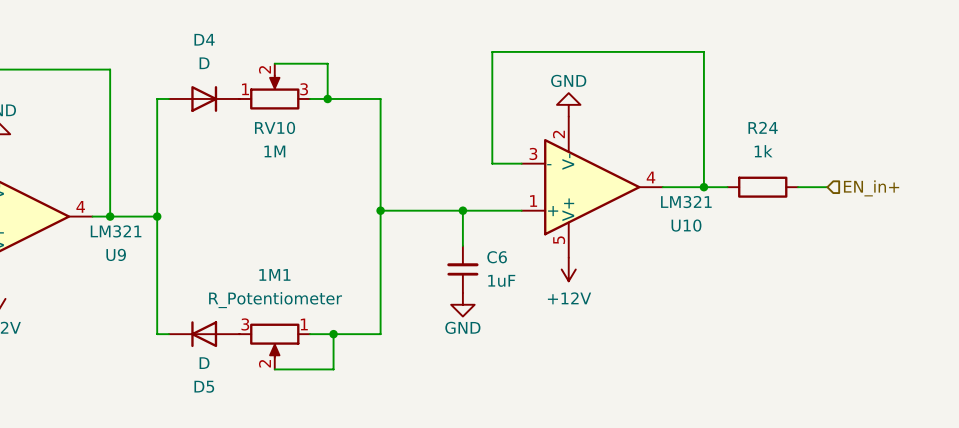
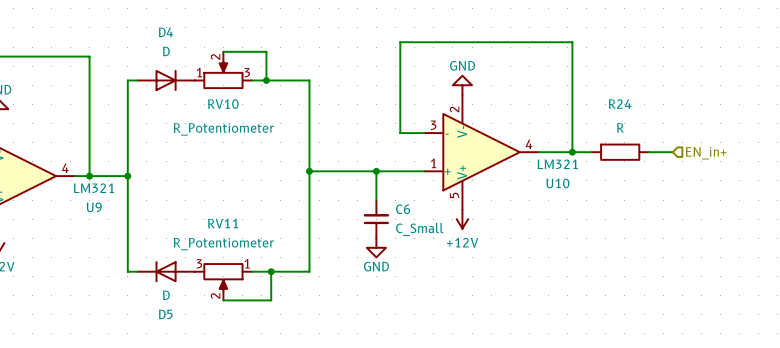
RV10 value: 1M (274, 151) -> R_Potentiometer (223, 129)
R24 value: 1k (763, 151) -> R (620, 127)
1M1 name: 1M1 (274, 274) -> RV11 (223, 223)
C6 value: 1uF (501, 280) -> C_Small (419, 229)

